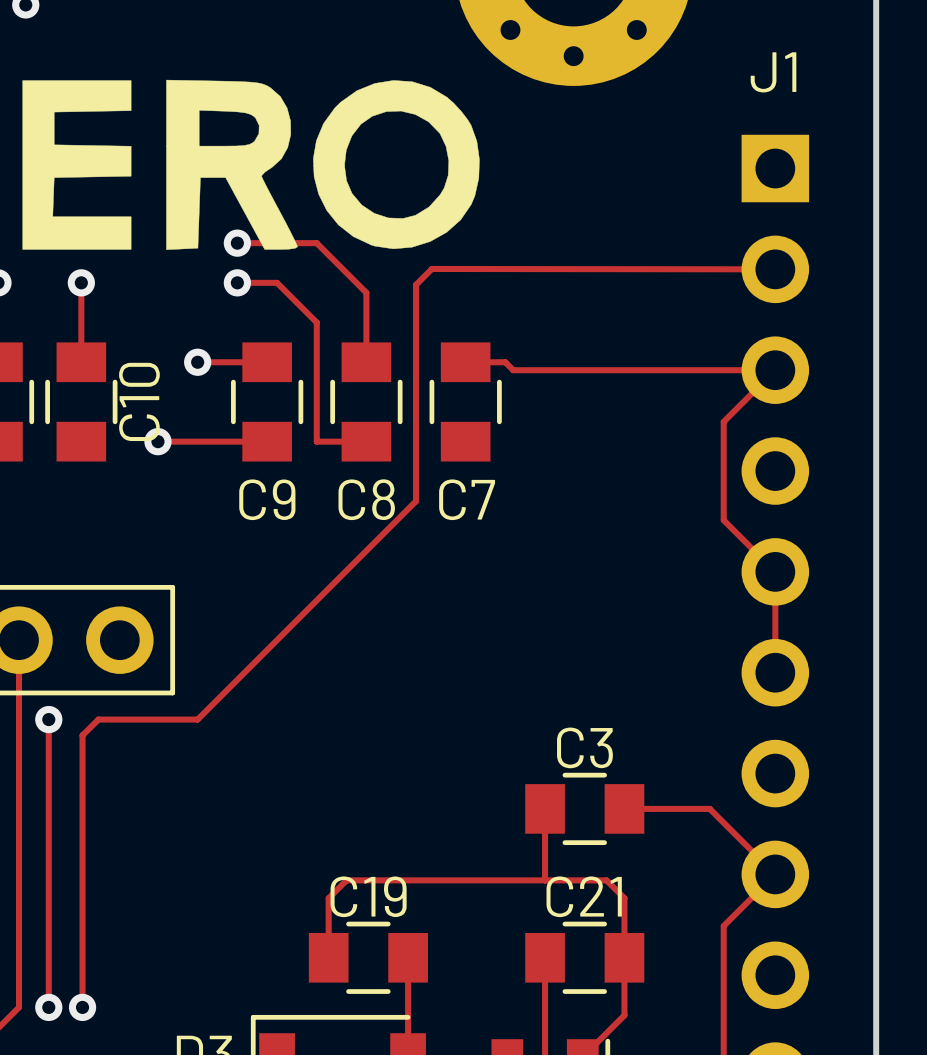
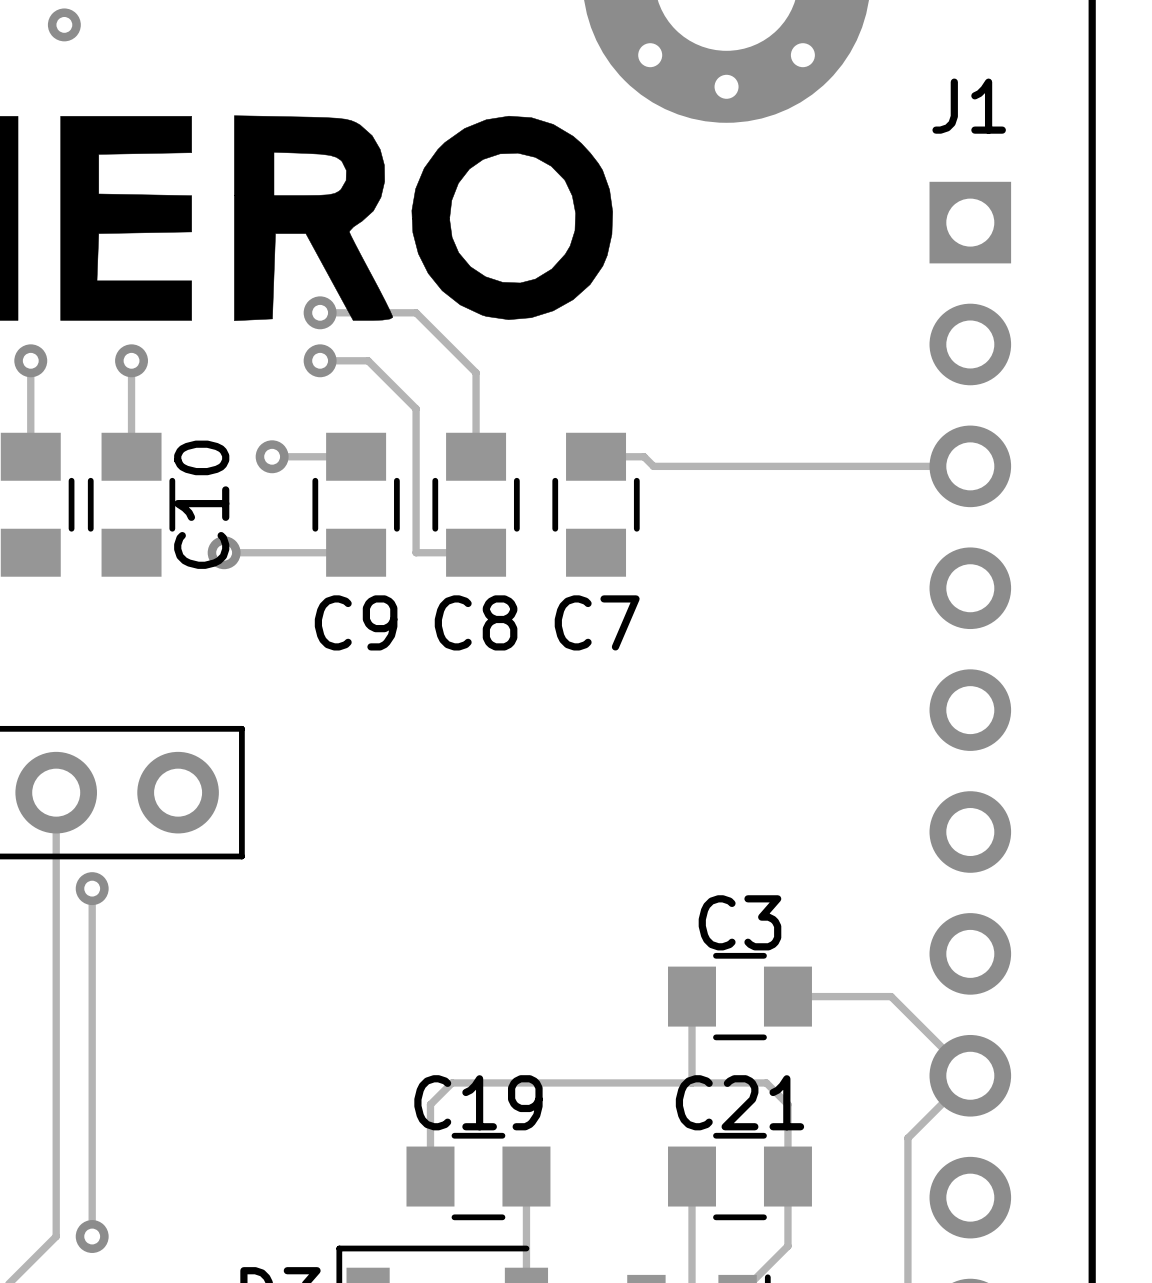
track: (775, 269) (431, 268) (416, 284) (416, 501) (197, 719) (98, 719) (82, 735) (82, 1007) -> none
track: (775, 370) (723, 421) (723, 520) (775, 571) (775, 672) -> none
via: (82, 1007) -> none

